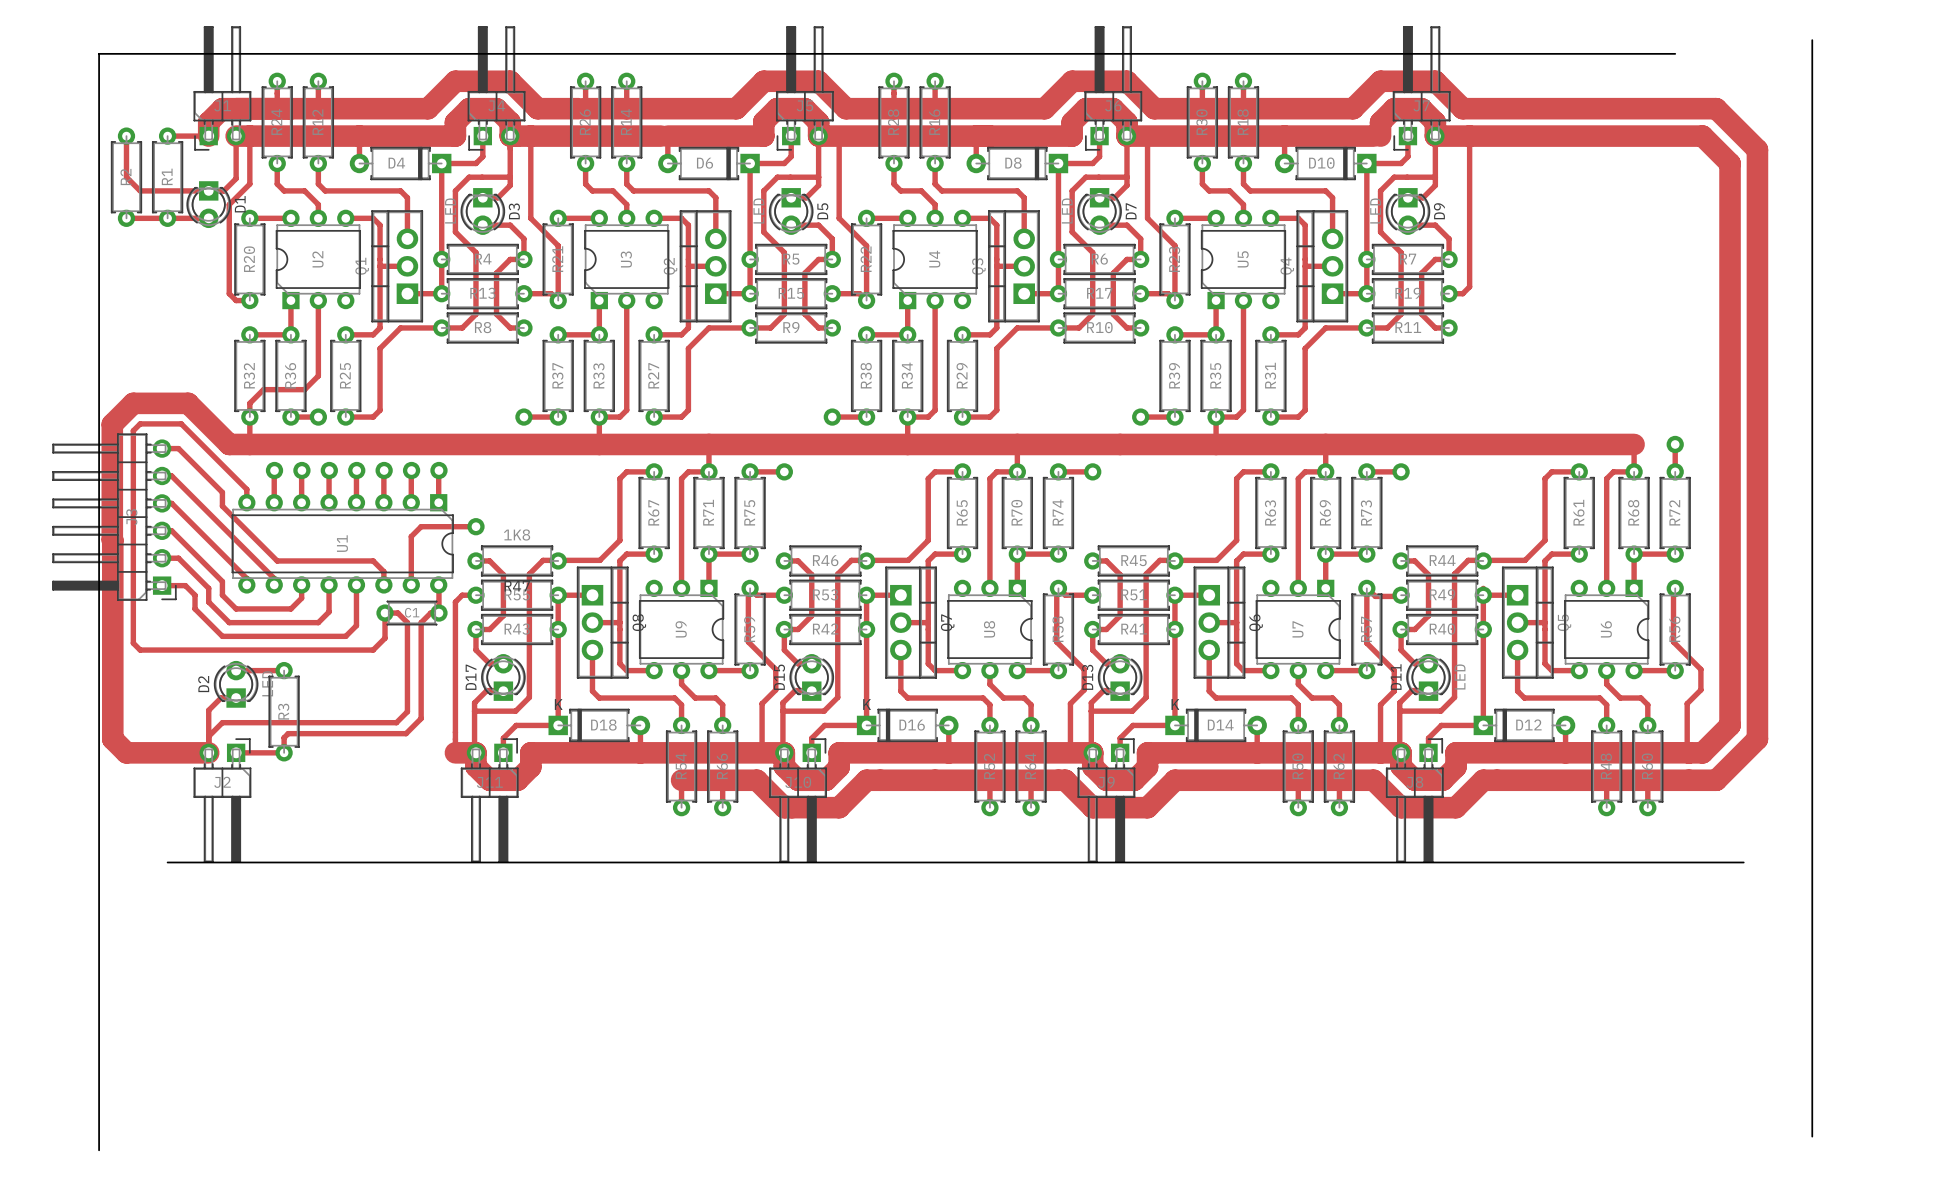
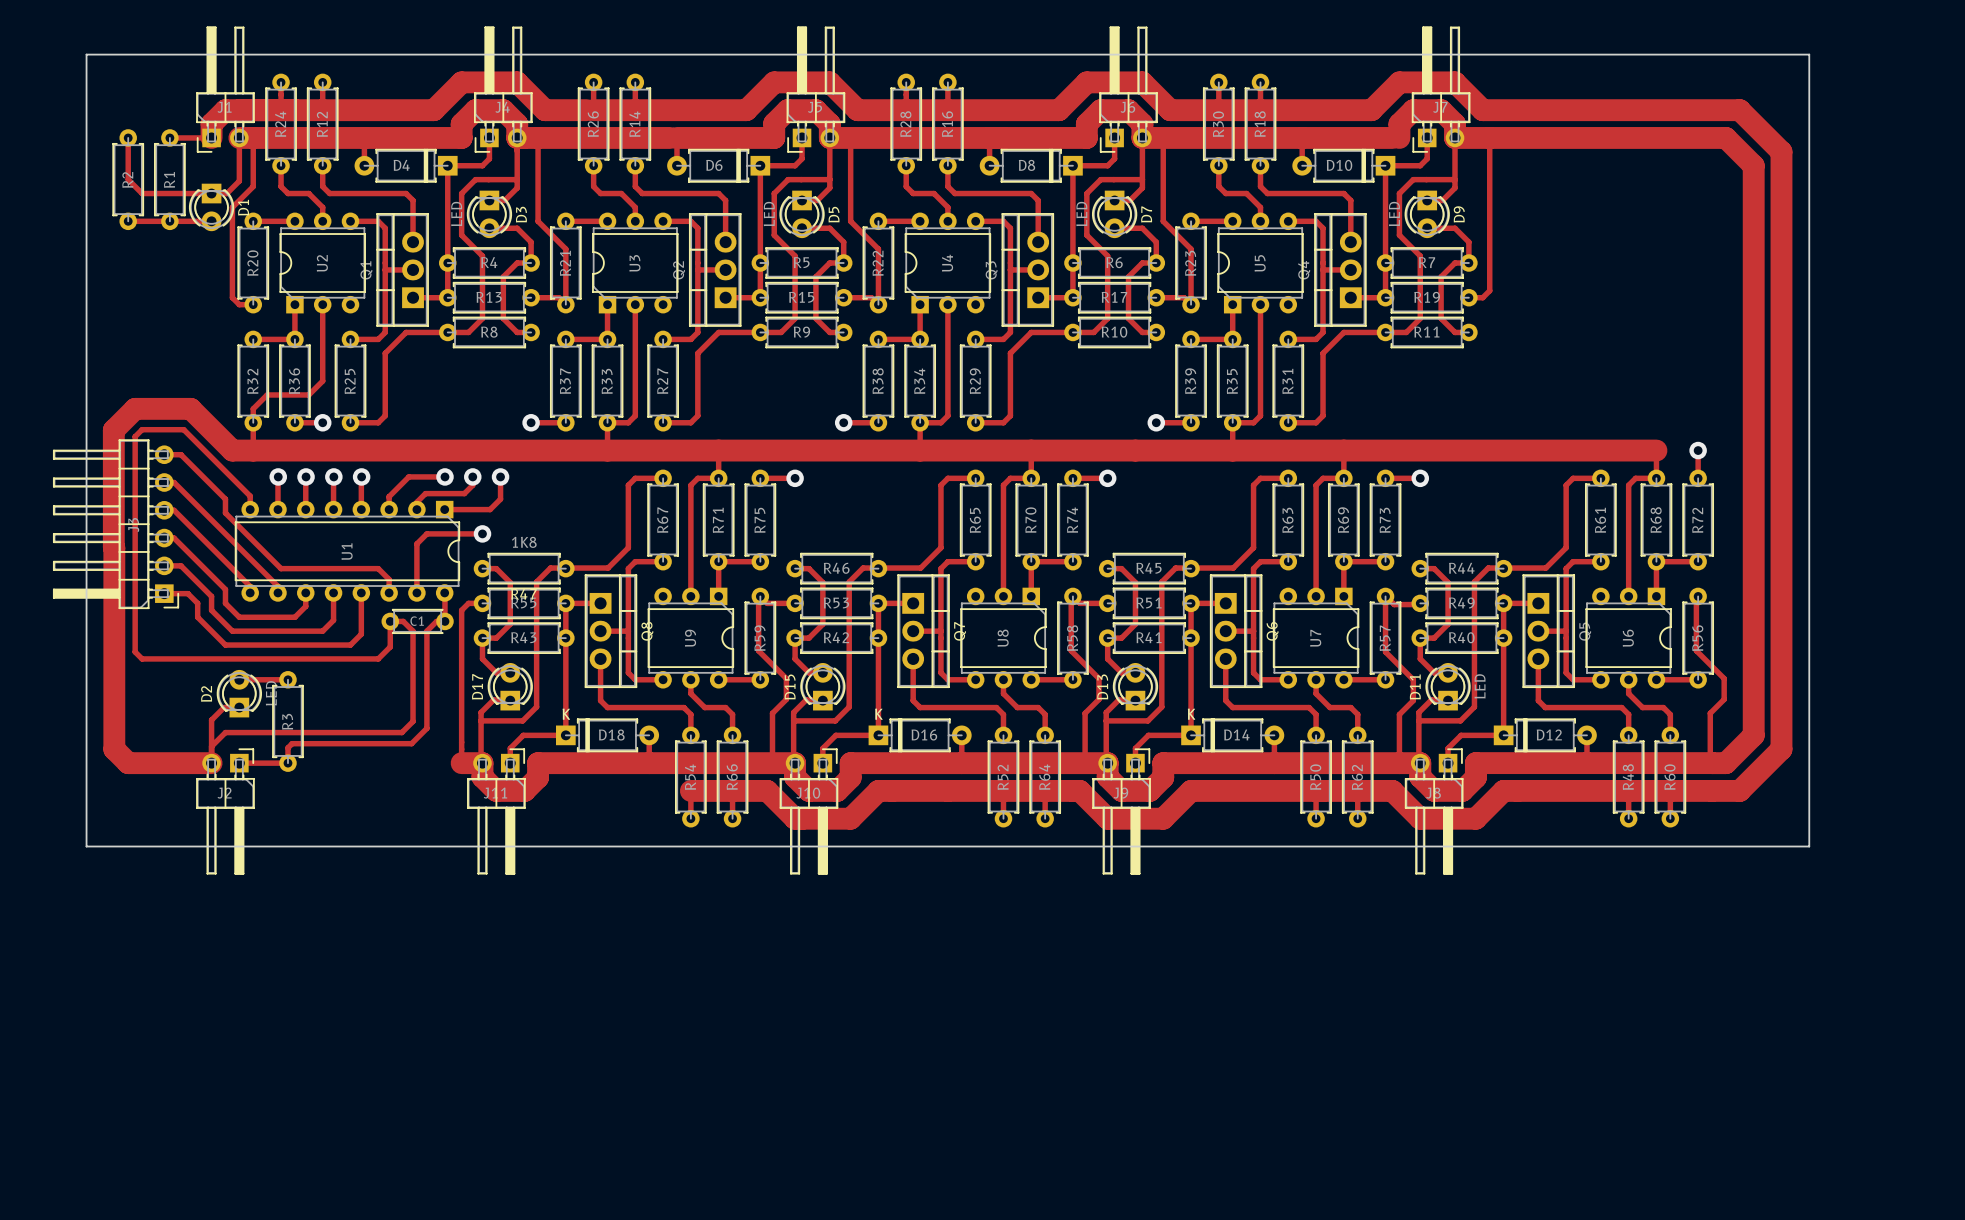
board edge: (1812, 40) (1812, 1136) -> none
board edge: (99, 53) (99, 1150) -> (100, 54) (86, 54) (86, 846) (1809, 846) (1809, 54) (1698, 54)
track: (384, 470) (383, 489) -> (444, 476) (408, 476) (389, 496)
via: (384, 470) -> none
track: (411, 470) (411, 495) -> (472, 476) (472, 485) (464, 493) (425, 493) (416, 502)
via: (411, 470) -> none
track: (438, 470) (438, 502) -> (500, 476) (500, 499) (490, 509) (444, 509)
via: none -> (472, 476)
via: none -> (500, 476)
board edge: (167, 862) (1743, 862) -> none

